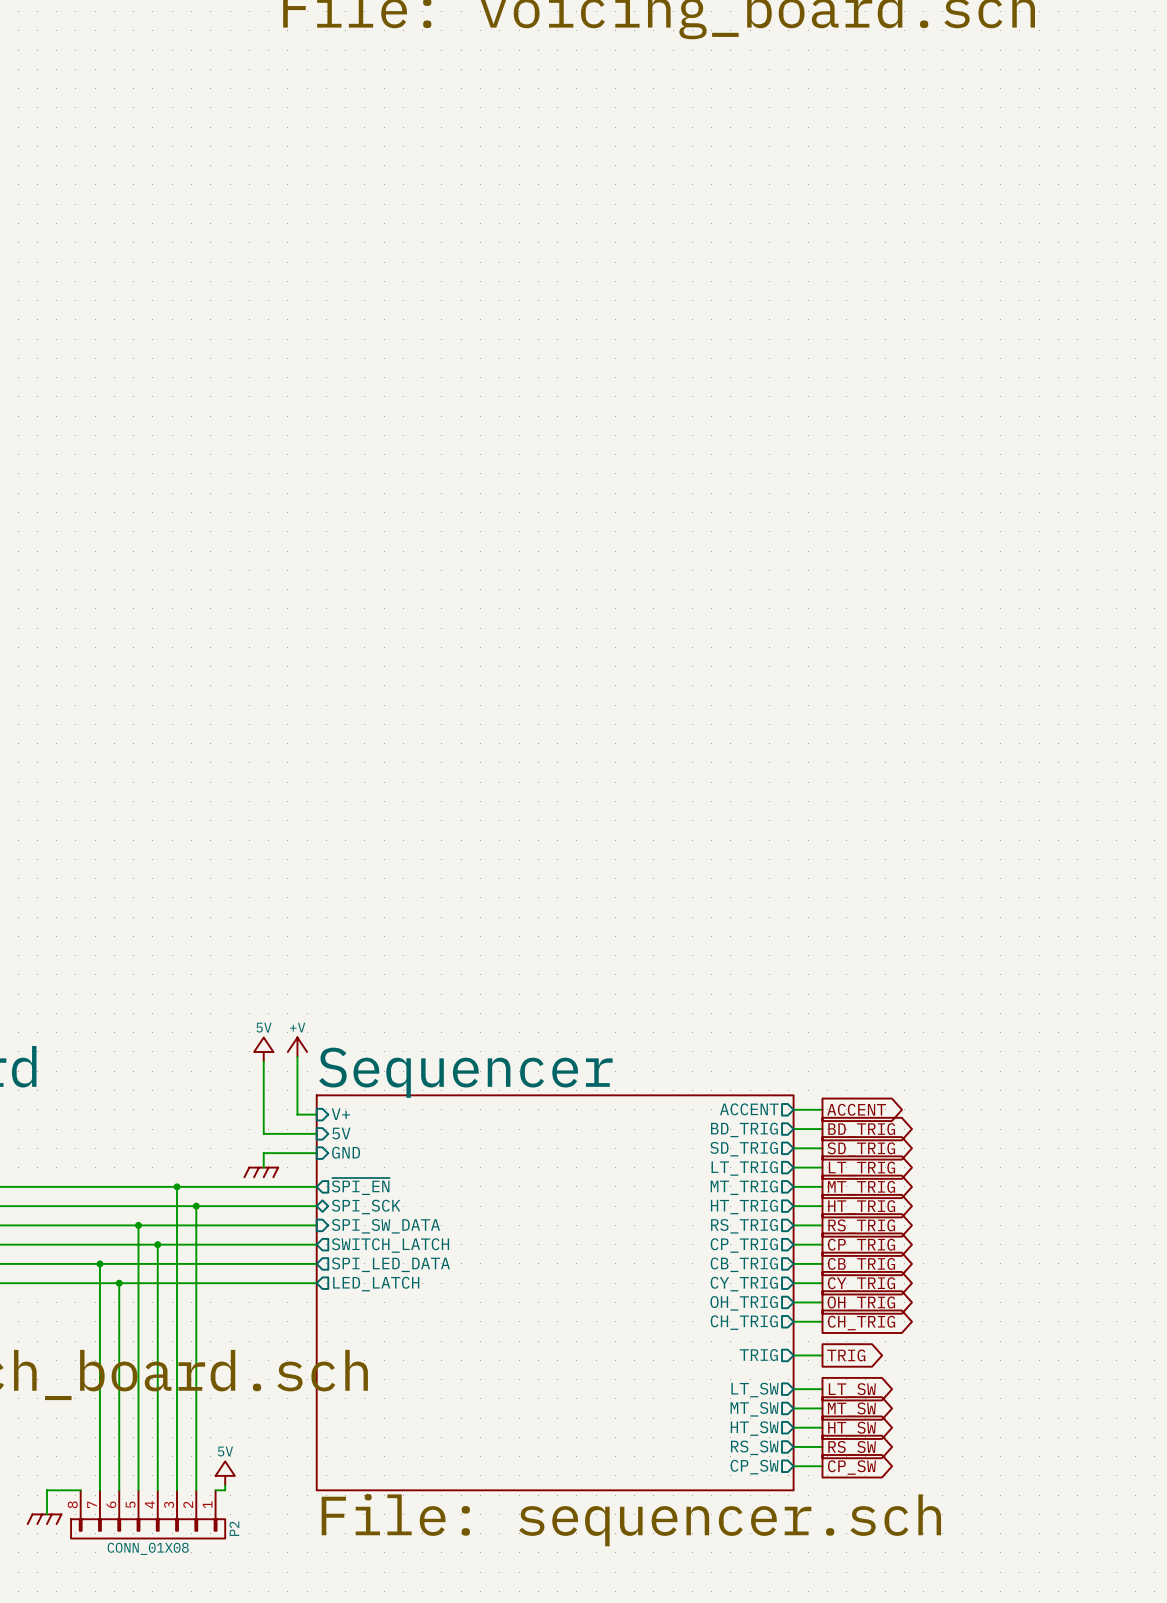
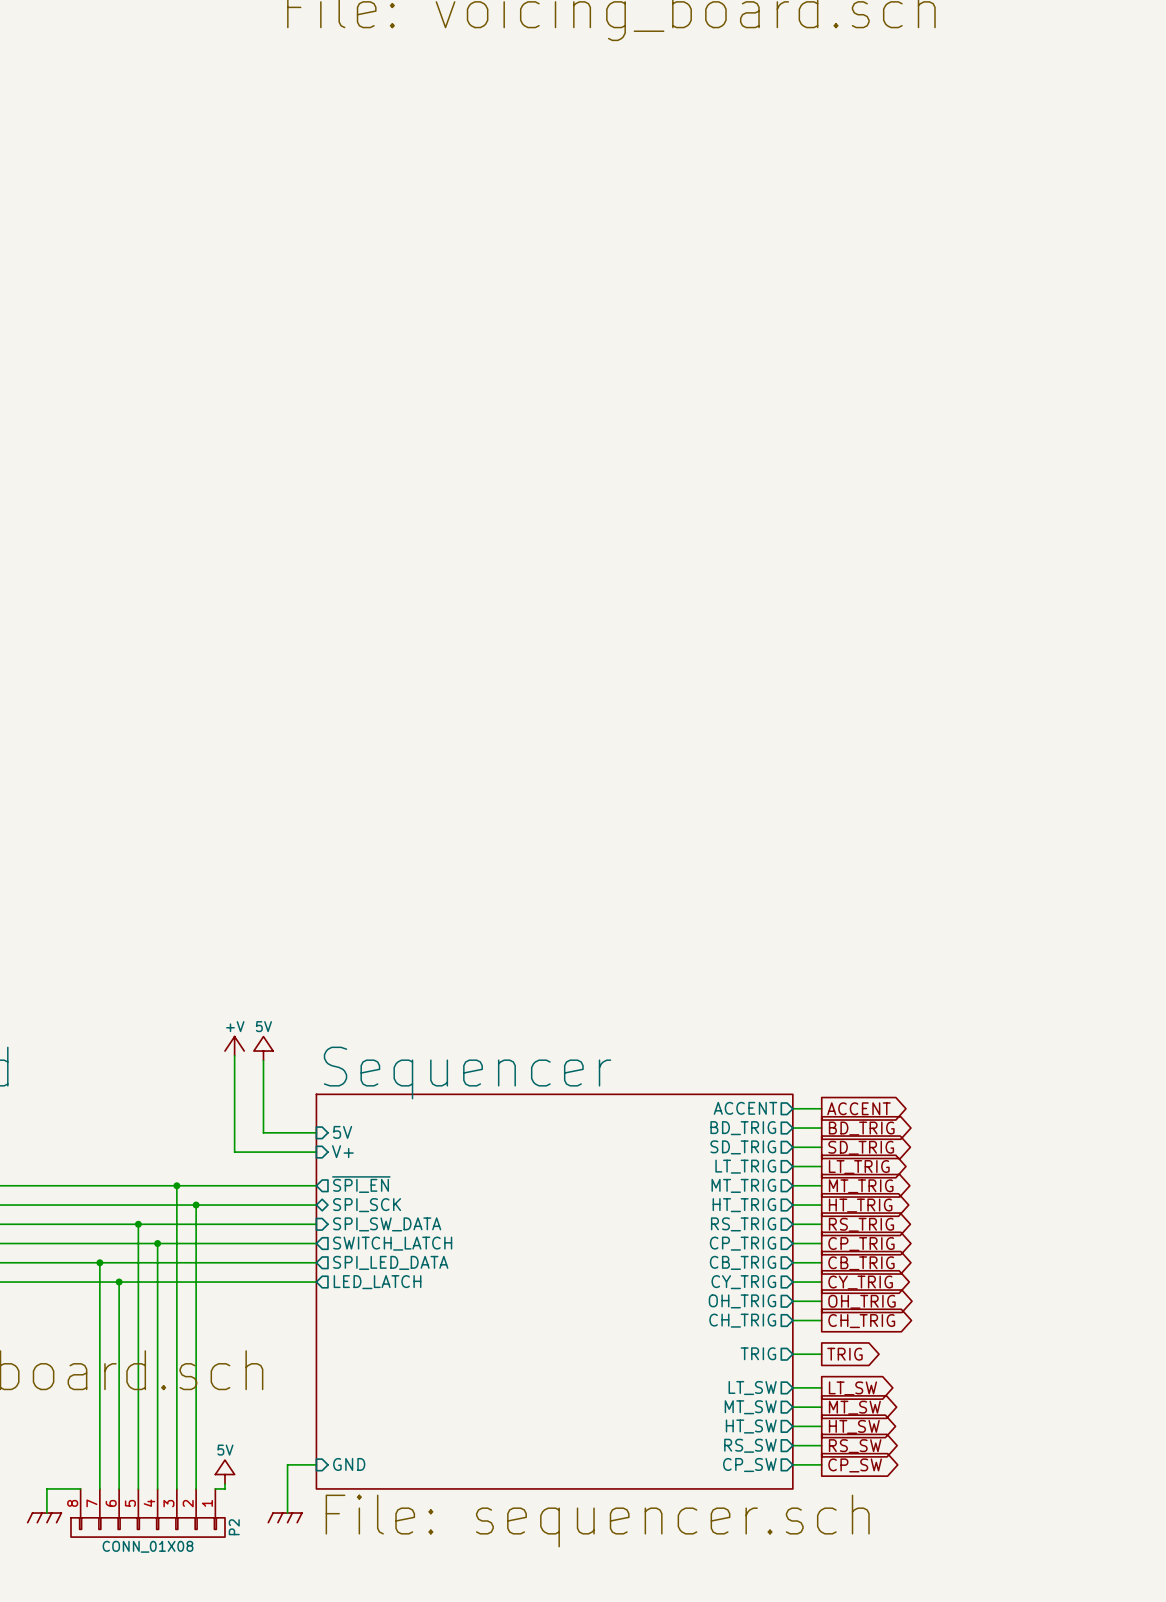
power symbol position: +V (297, 1047) -> +V (234, 1046)
wire: (297, 1056) (297, 1114) (316, 1114) -> none
sheet pin: V+ (340, 1114) -> none
sheet pin: GND (346, 1152) -> V+ (342, 1151)
wire: (263, 1153) (263, 1167) -> (263, 1152) (234, 1152) (234, 1055)
power symbol: (261, 1172) -> none
sheet pin: none -> GND (349, 1464)
wire: none -> (316, 1464) (287, 1464) (287, 1513)
power symbol: none -> (285, 1517)

